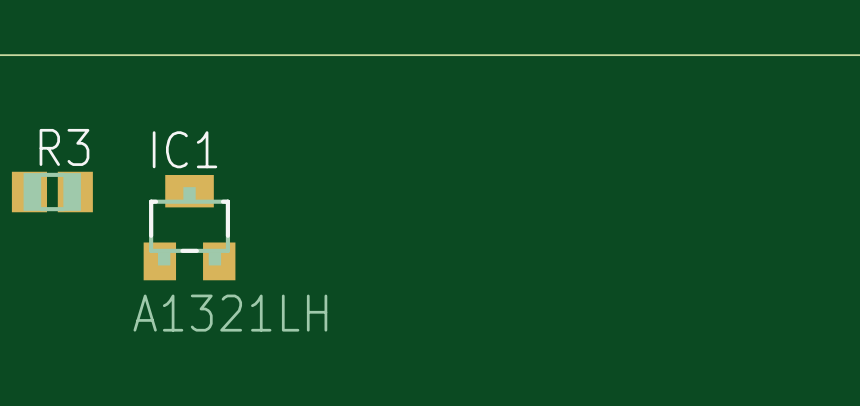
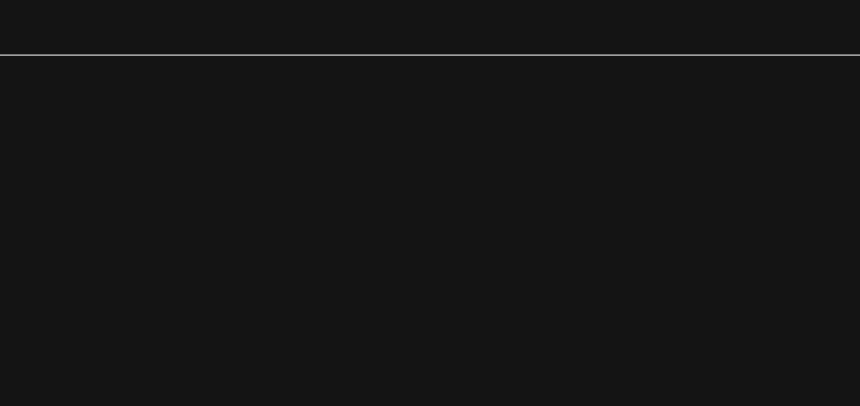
R3: (52, 192) -> none
IC1: A1321LH (189, 227) -> none

